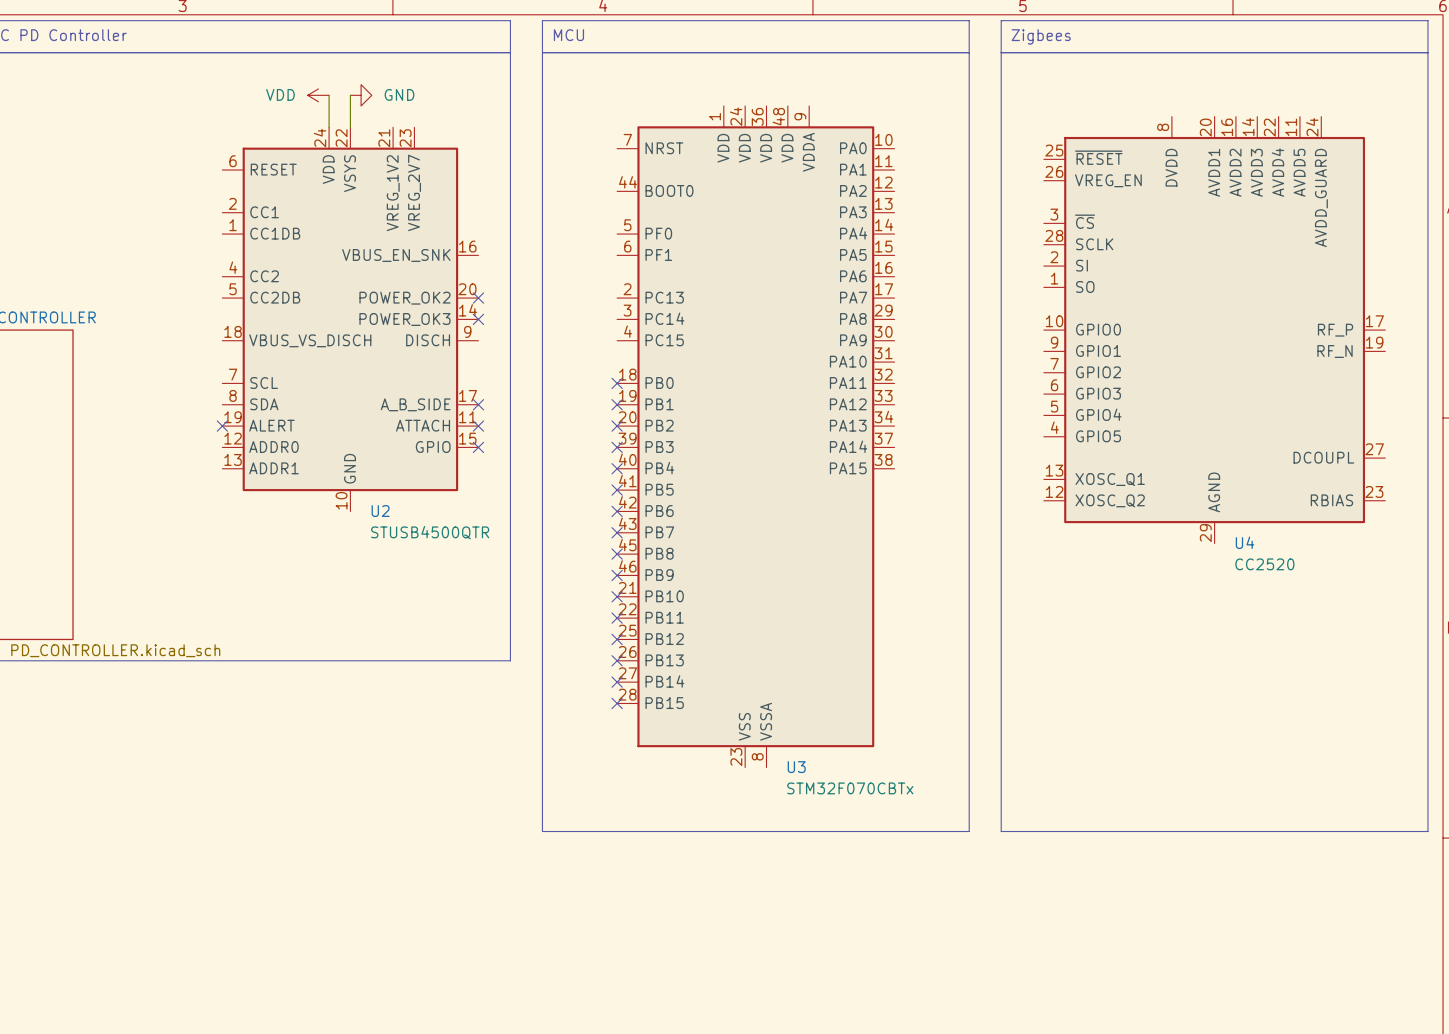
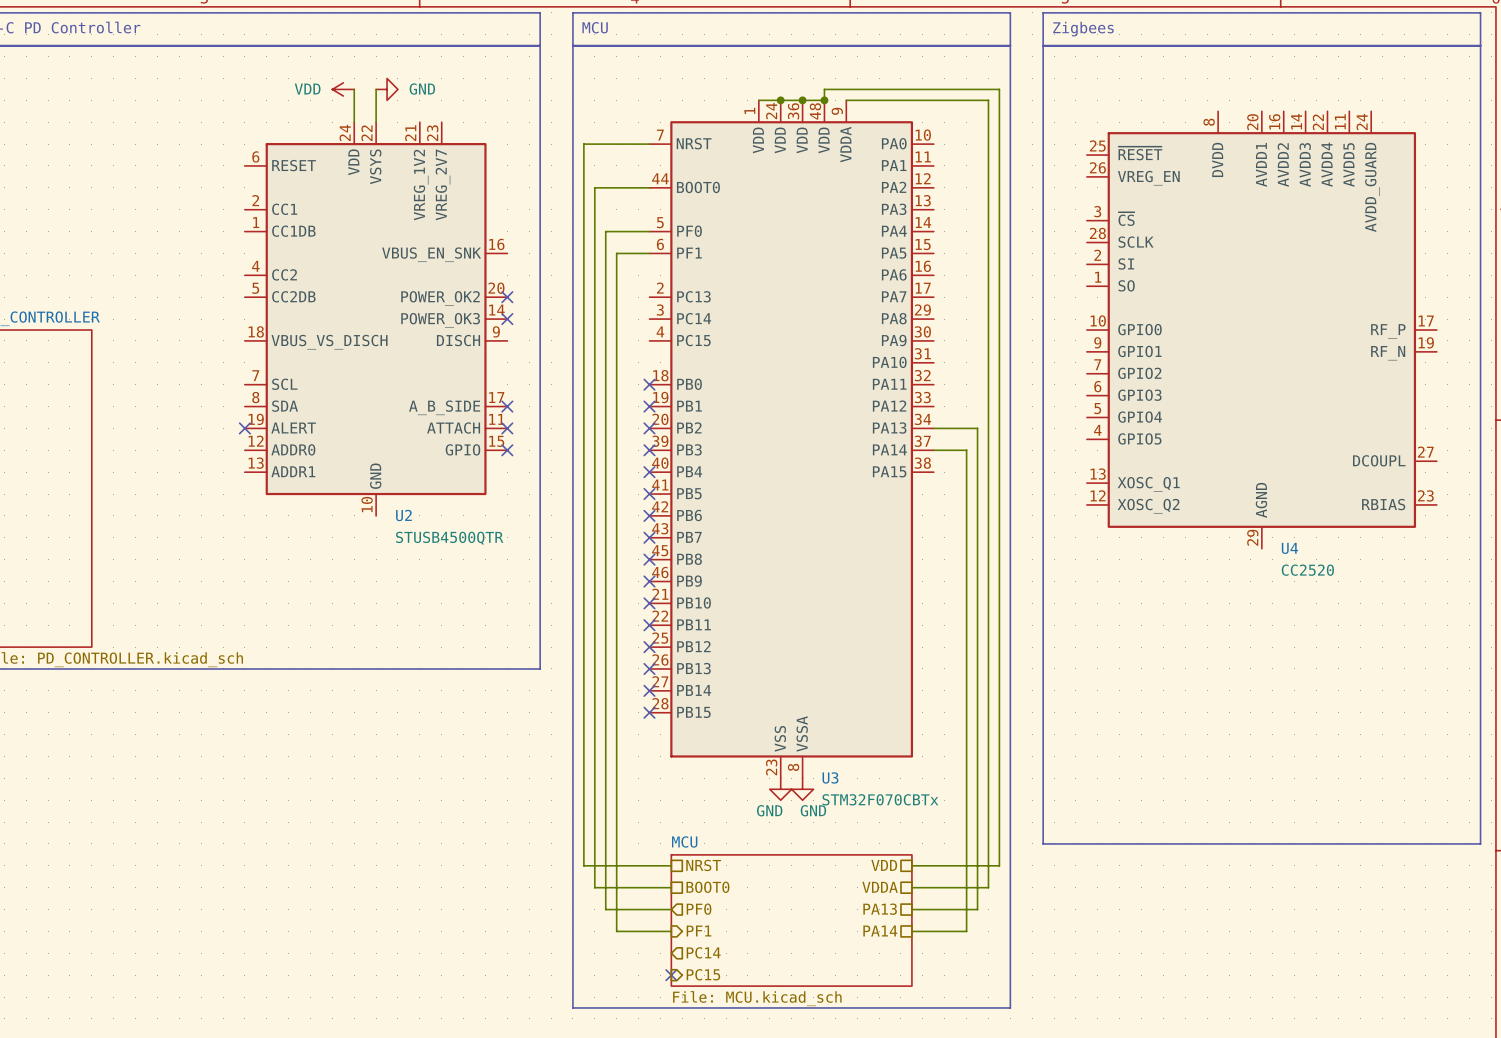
wire: none -> (758, 100) (824, 100) (824, 89) (999, 89) (999, 865) (911, 865)
junction: none -> (780, 100)
junction: none -> (802, 100)
junction: none -> (824, 100)
wire: none -> (846, 100) (988, 100) (988, 887) (911, 887)
wire: none -> (649, 144) (583, 144) (583, 865) (671, 865)
wire: none -> (649, 187) (594, 187) (594, 887) (671, 887)
wire: none -> (649, 231) (605, 231) (605, 909) (671, 909)
wire: none -> (649, 253) (616, 253) (616, 931) (671, 931)
wire: none -> (933, 428) (977, 428) (977, 909) (911, 909)
wire: none -> (933, 450) (966, 450) (966, 931) (911, 931)
power symbol: none -> GND (780, 789)
power symbol: none -> GND (802, 789)
line: (542, 831) (969, 831) -> (572, 843) (572, 1007) (1010, 1007) (1010, 843)
hierarchical label: none -> NRST (703, 865)
hierarchical label: none -> VDD (884, 865)
hierarchical label: none -> BOOT0 (707, 887)
hierarchical label: none -> VDDA (880, 887)
hierarchical label: none -> PF0 (699, 909)
hierarchical label: none -> PA13 (880, 909)
sheet MCU: none -> File: MCU.kicad_sch (791, 920)
hierarchical label: none -> PF1 (699, 931)
hierarchical label: none -> PA14 (880, 931)
hierarchical label: none -> PC14 (703, 952)
no-connect mark: none -> (671, 975)
hierarchical label: none -> PC15 (703, 974)

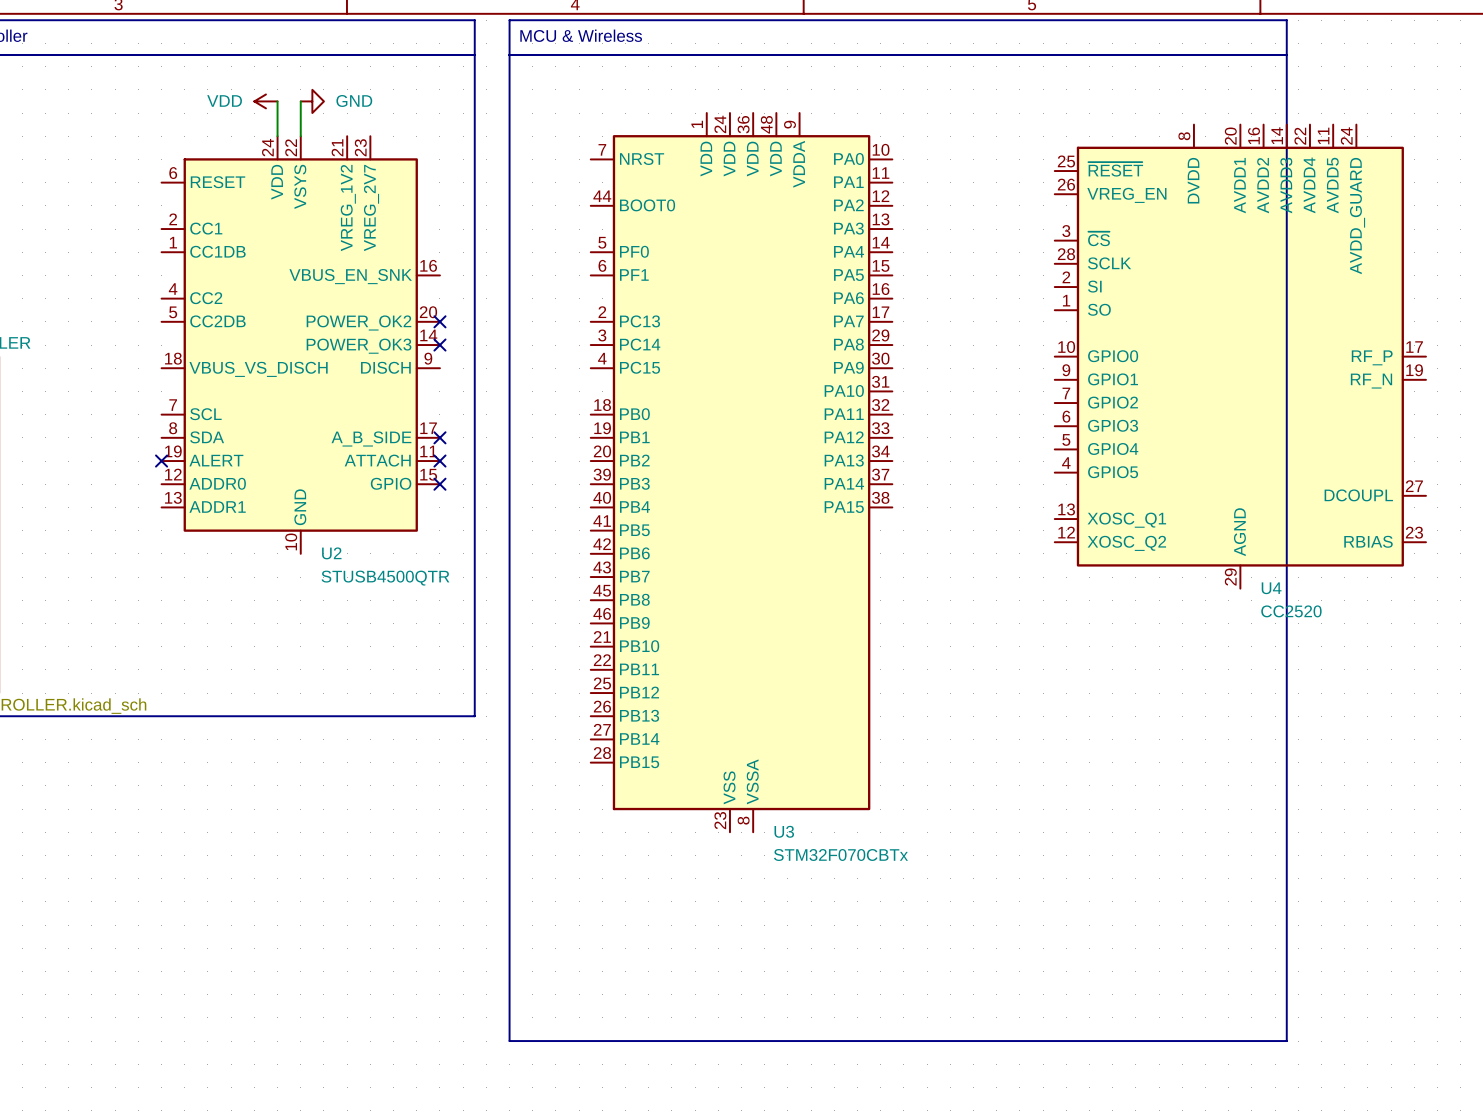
line: (1010, 12) (1010, 1007) (572, 1007) (572, 975) -> (1286, 20) (1286, 1041) (509, 1041)
line: (1043, 12) (1043, 843) (1480, 843) (1480, 12) (1305, 12) -> (1008, 20) (973, 20)
text: MCU (595, 27) -> MCU & Wireless (581, 35)
text: Zigbees (1083, 29) -> none
line: none -> (973, 55) (1008, 55)
line: (1305, 45) (1480, 45) -> none
wire: (758, 100) (824, 100) (824, 89) (999, 89) (999, 865) (911, 865) -> none
junction: (780, 100) -> none
junction: (802, 100) -> none
junction: (824, 100) -> none
wire: (846, 100) (988, 100) (988, 887) (911, 887) -> none
wire: (649, 144) (583, 144) (583, 865) (671, 865) -> none
wire: (649, 187) (594, 187) (594, 887) (671, 887) -> none
wire: (649, 231) (605, 231) (605, 909) (671, 909) -> none
wire: (649, 253) (616, 253) (616, 931) (671, 931) -> none
no-connect mark: (649, 384) -> none
no-connect mark: (649, 406) -> none
no-connect mark: (649, 428) -> none
wire: (933, 428) (977, 428) (977, 909) (911, 909) -> none
no-connect mark: (649, 450) -> none
wire: (933, 450) (966, 450) (966, 931) (911, 931) -> none
no-connect mark: (649, 472) -> none
no-connect mark: (649, 494) -> none
no-connect mark: (649, 515) -> none
no-connect mark: (649, 537) -> none
no-connect mark: (649, 559) -> none
no-connect mark: (649, 581) -> none
no-connect mark: (649, 603) -> none
no-connect mark: (649, 625) -> none
no-connect mark: (649, 647) -> none
no-connect mark: (649, 668) -> none
no-connect mark: (649, 690) -> none
no-connect mark: (649, 712) -> none
power symbol: GND (780, 789) -> none
power symbol: GND (802, 789) -> none
hierarchical label: NRST (703, 865) -> none
hierarchical label: VDD (884, 865) -> none
hierarchical label: BOOT0 (707, 887) -> none
hierarchical label: VDDA (880, 887) -> none
hierarchical label: PF0 (699, 909) -> none
hierarchical label: PA13 (880, 909) -> none
sheet MCU: File: MCU.kicad_sch (791, 920) -> none
hierarchical label: PF1 (699, 931) -> none
hierarchical label: PA14 (880, 931) -> none
hierarchical label: PC14 (703, 952) -> none
hierarchical label: PC15 (703, 974) -> none
no-connect mark: (671, 975) -> none

